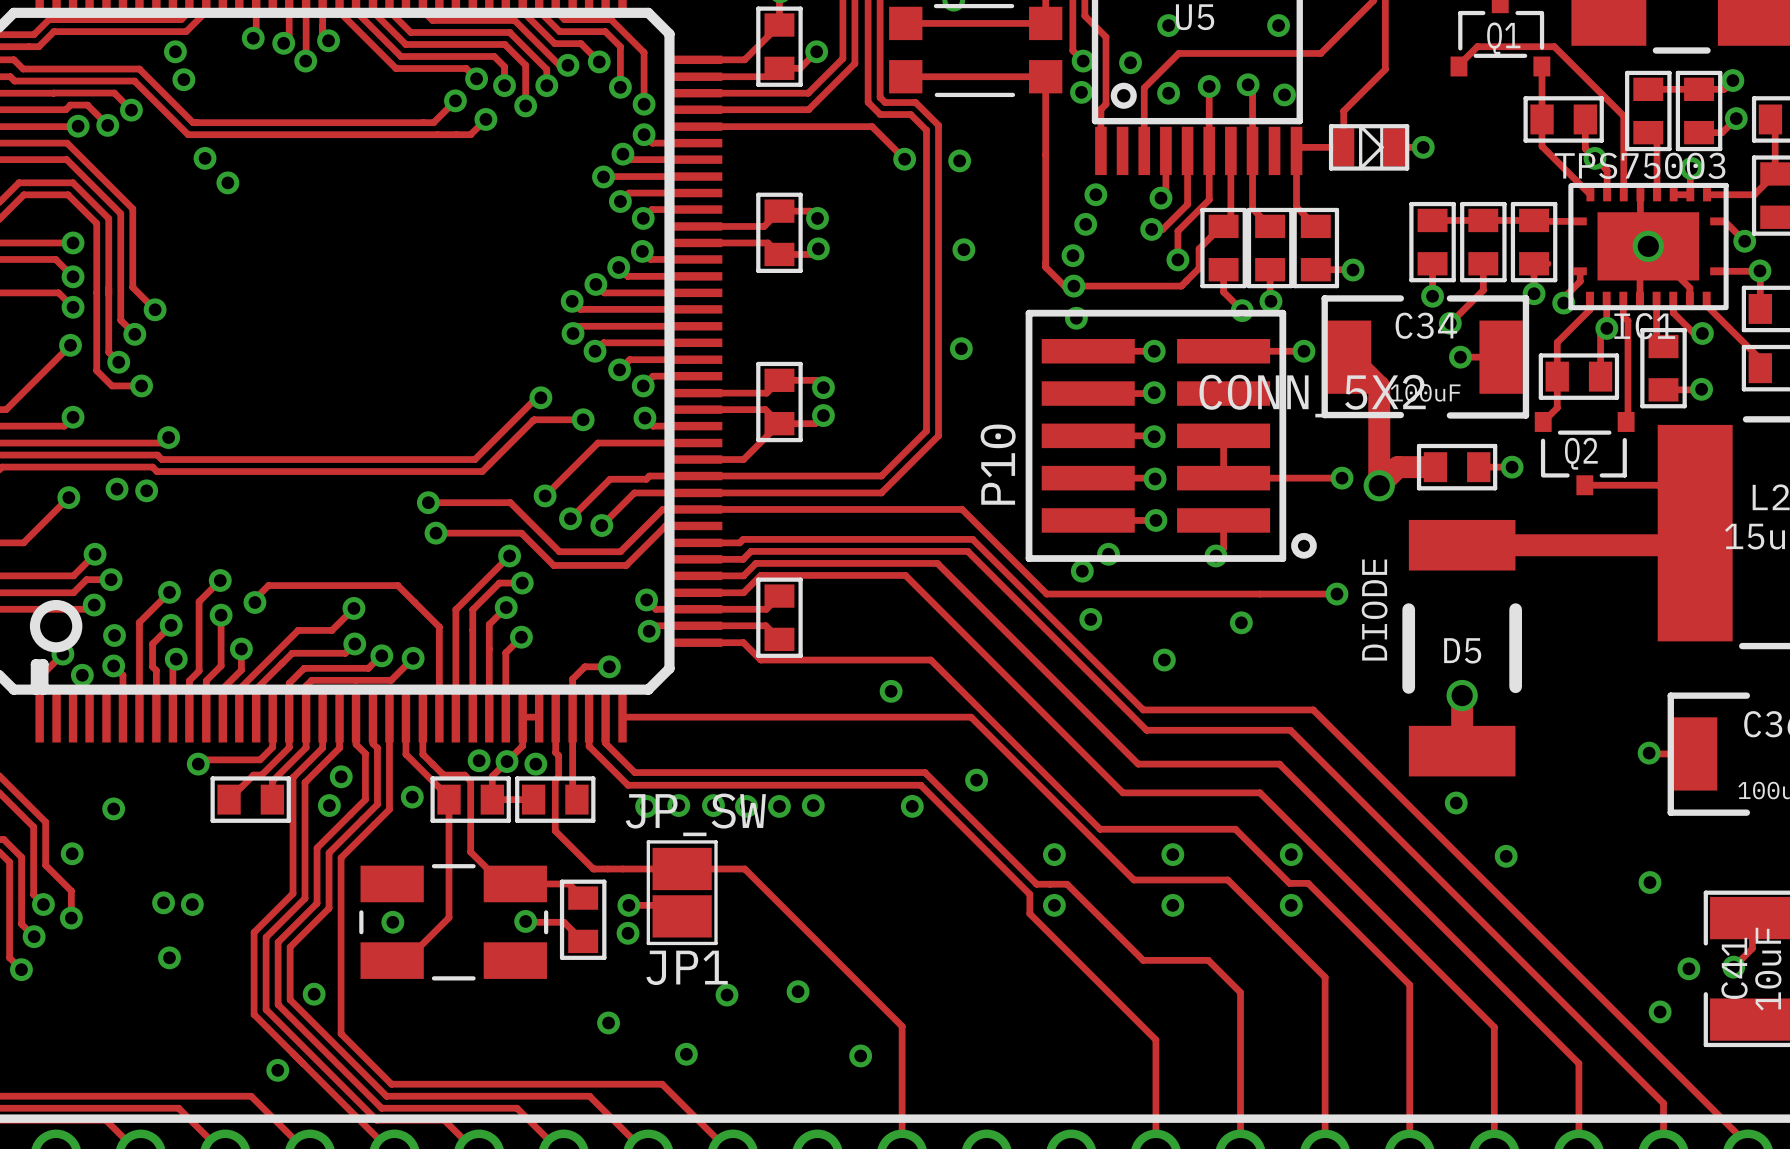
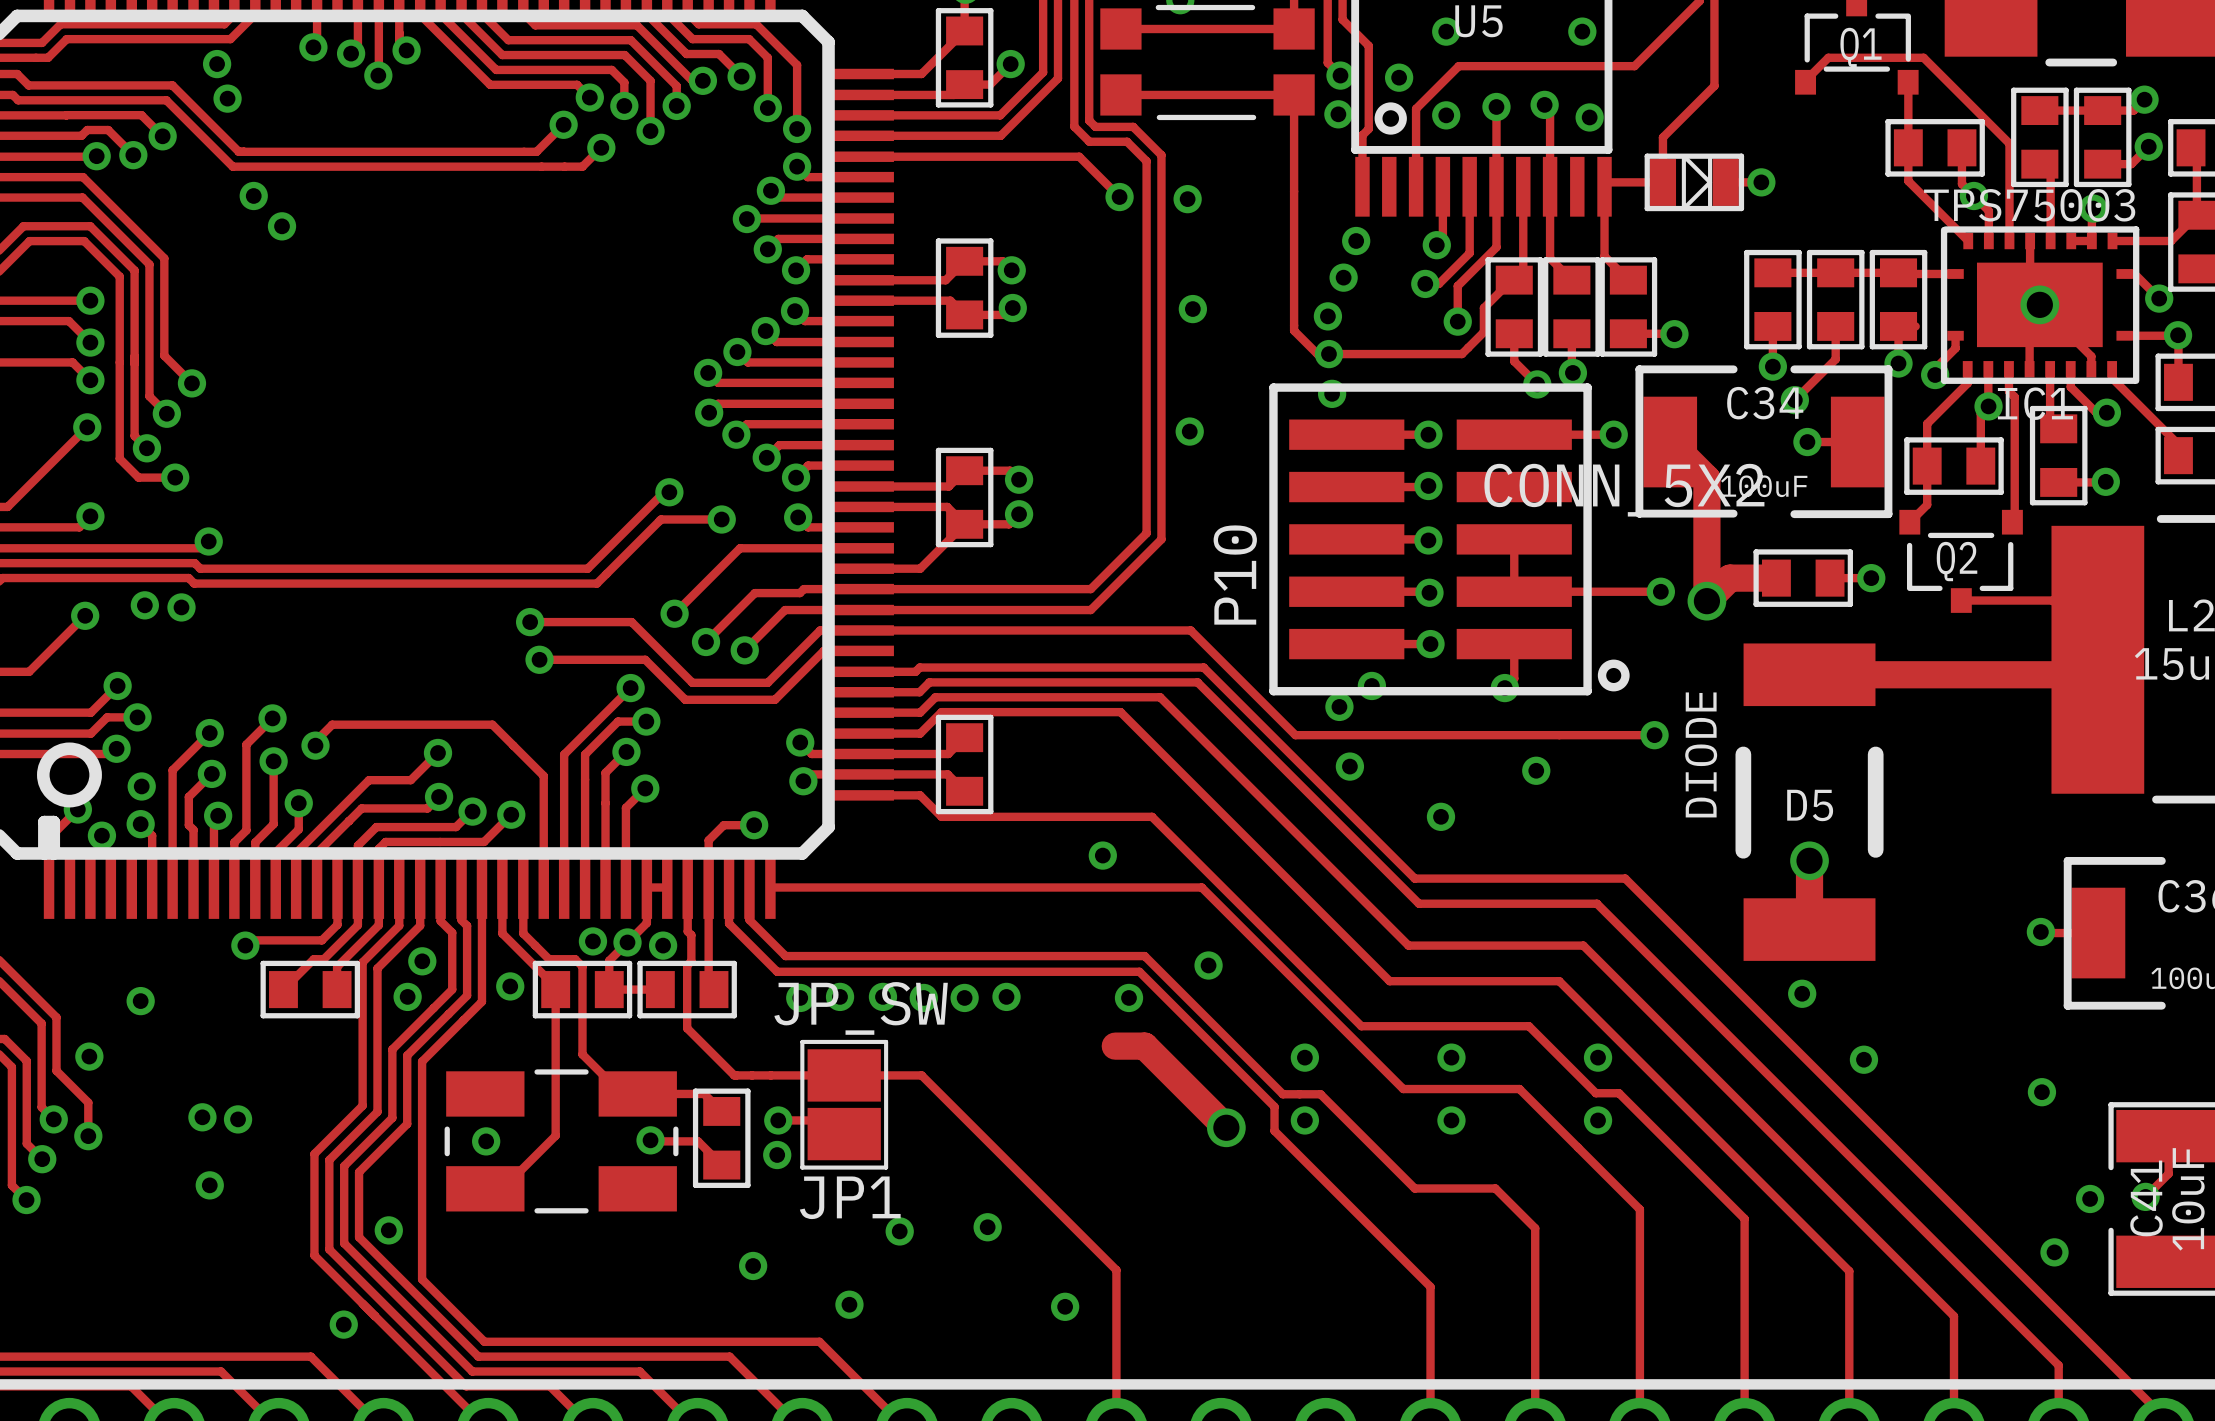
track: none -> (1115, 1046) (1144, 1046) (1226, 1127)
via: none -> (1226, 1127)

